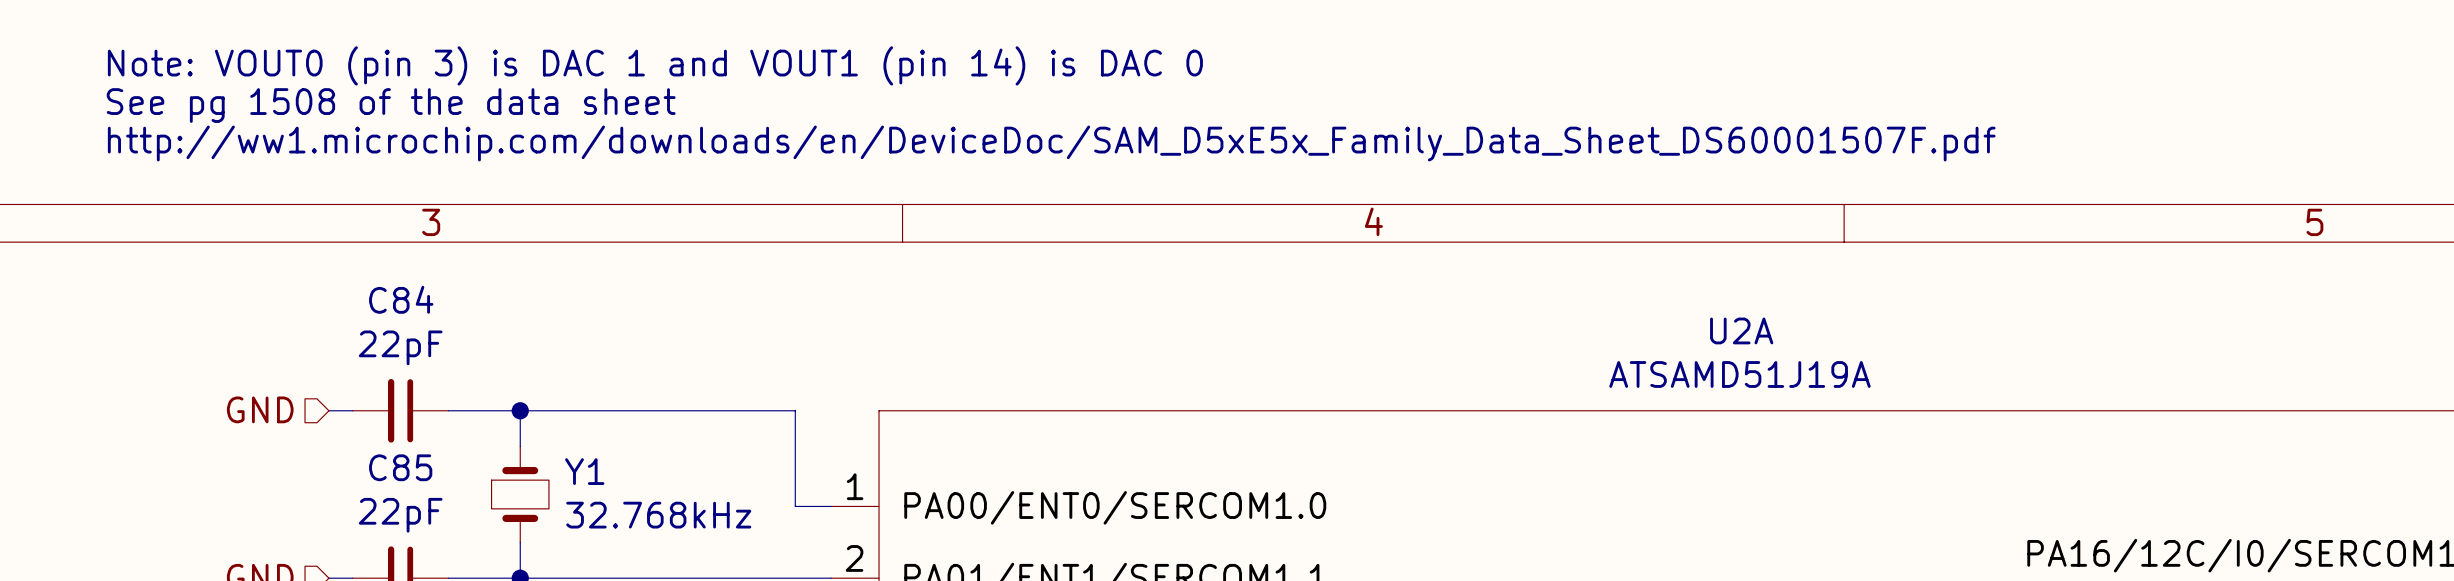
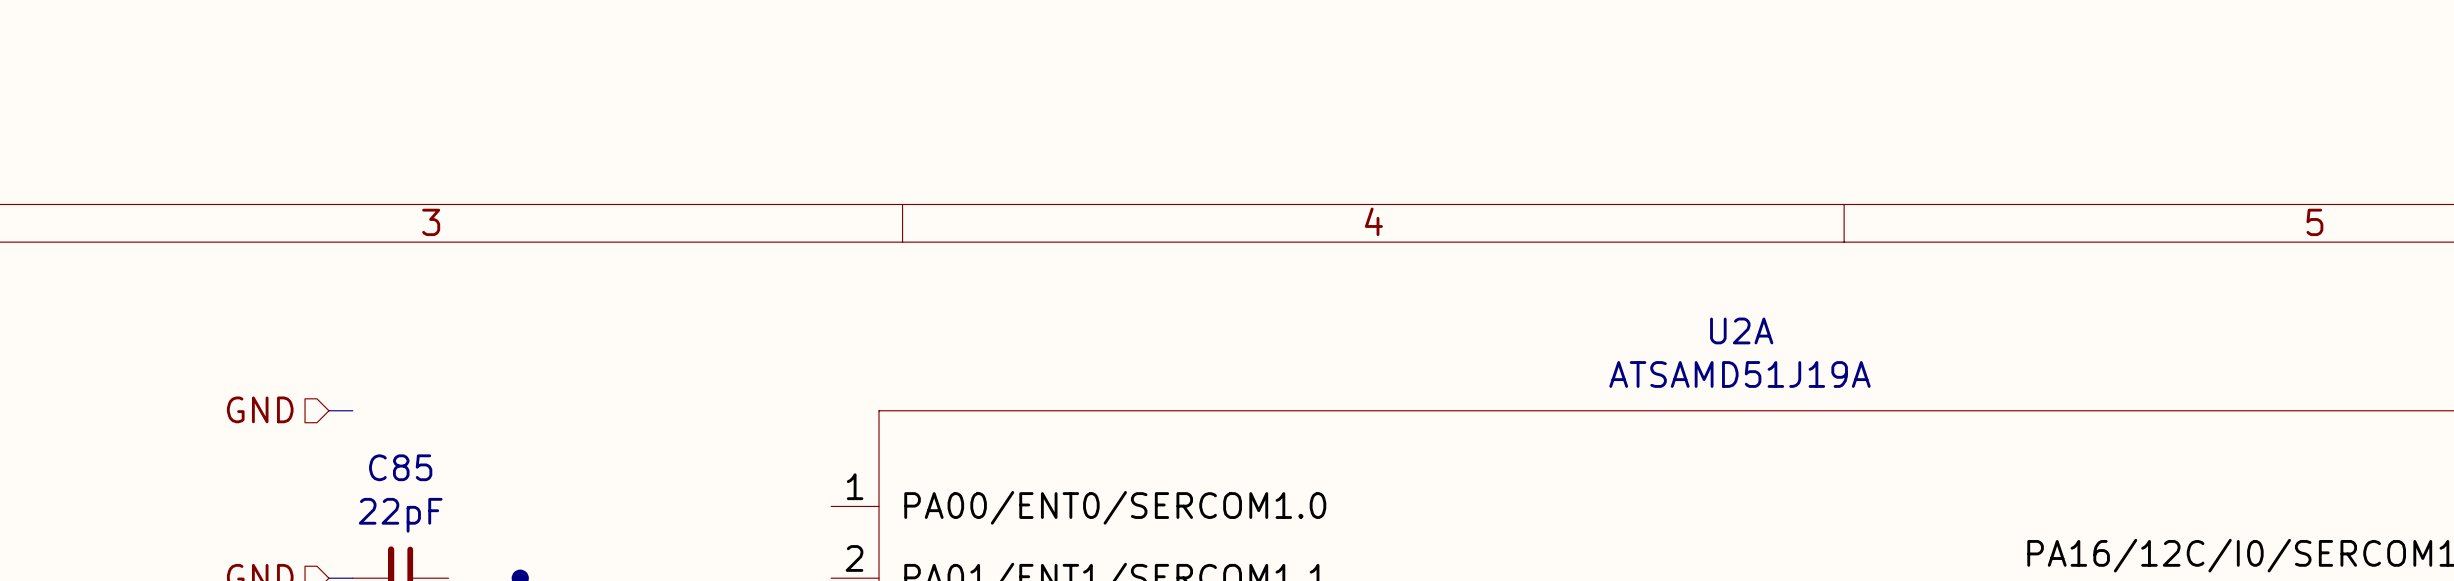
text: Note: VOUT0 (pin 3) is DAC 1 and VOUT1 (pin 14) is DAC 0 (655, 65) -> none
text: See pg 1508 of the data sheet (391, 105) -> none
text: http://ww1.microchip.com/downloads/en/DeviceDoc/SAM_D5xE5x_Family_Data_Sheet_DS60001507F.pdf (1051, 143) -> none
C84: 22pF (400, 410) -> none
wire: (448, 410) (795, 410) (795, 506) (831, 506) -> none
wire: (520, 410) (520, 446) -> none
junction: (520, 410) -> none
Y1: 32.768kHz (520, 494) -> none
wire: (520, 542) (520, 578) -> none
wire: (448, 578) (831, 578) -> none

